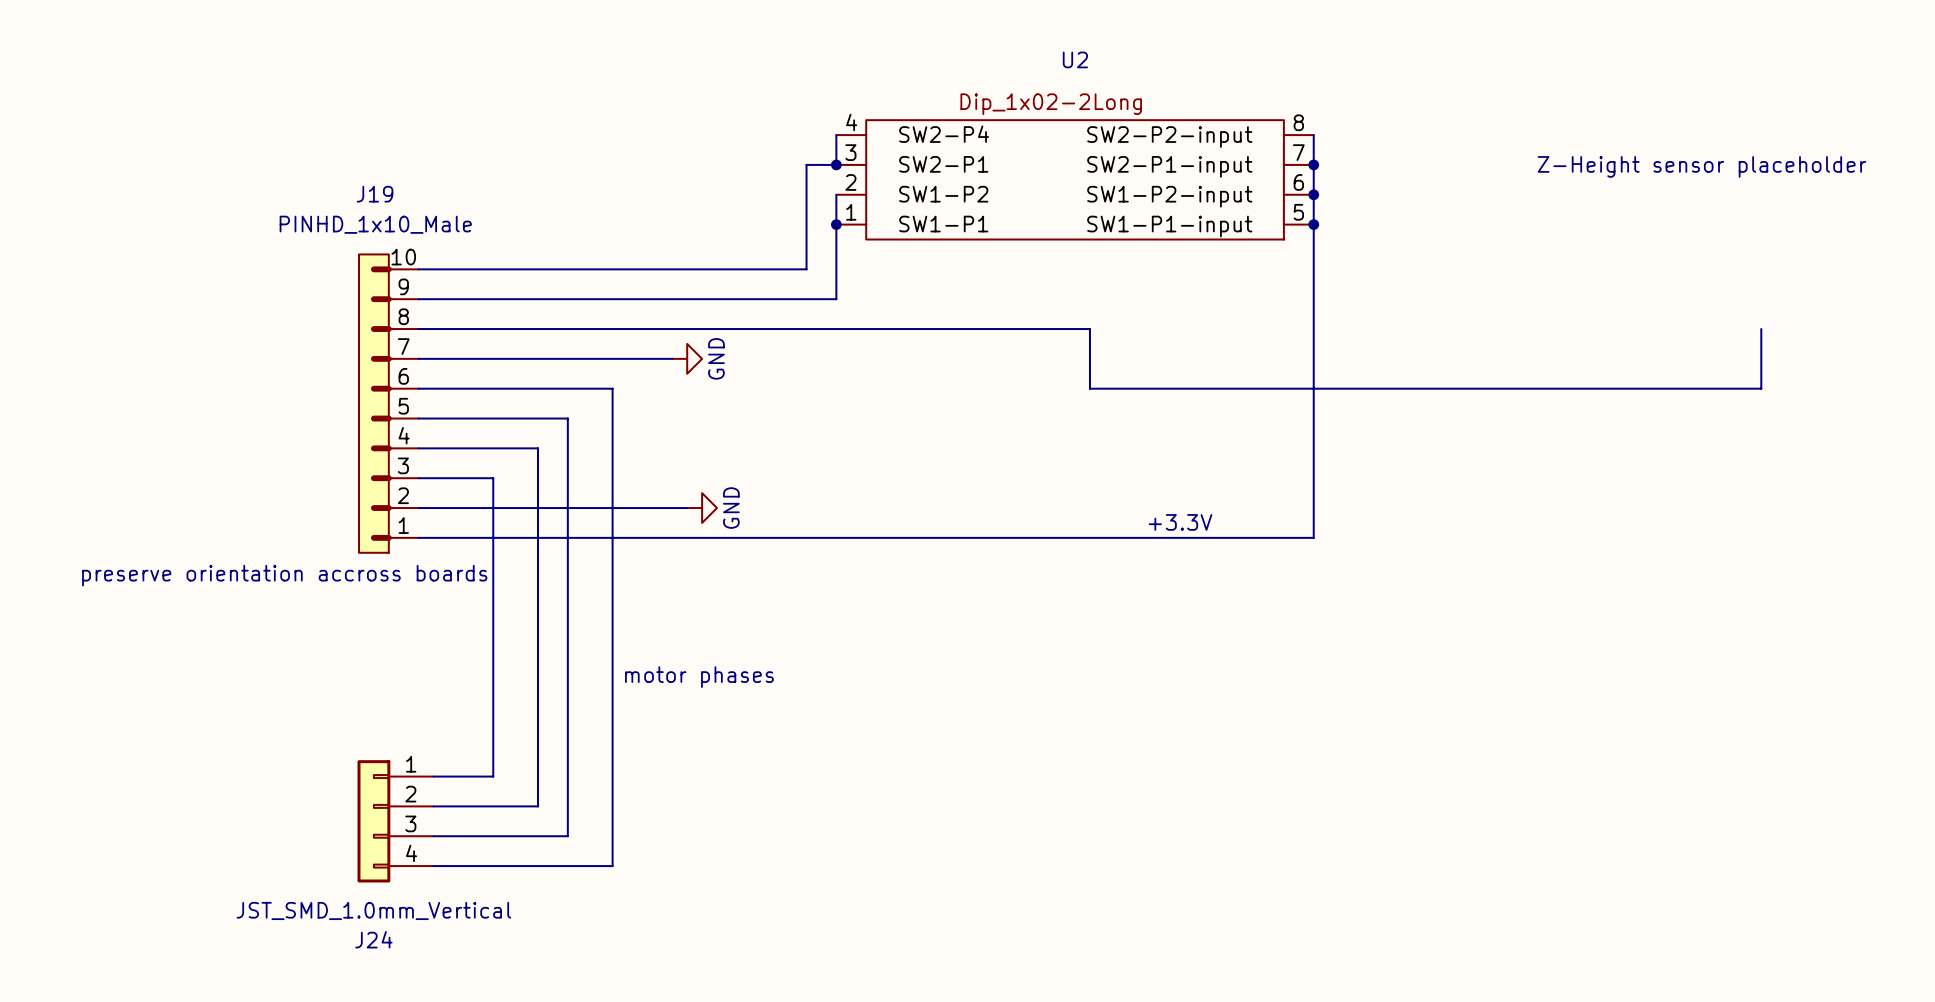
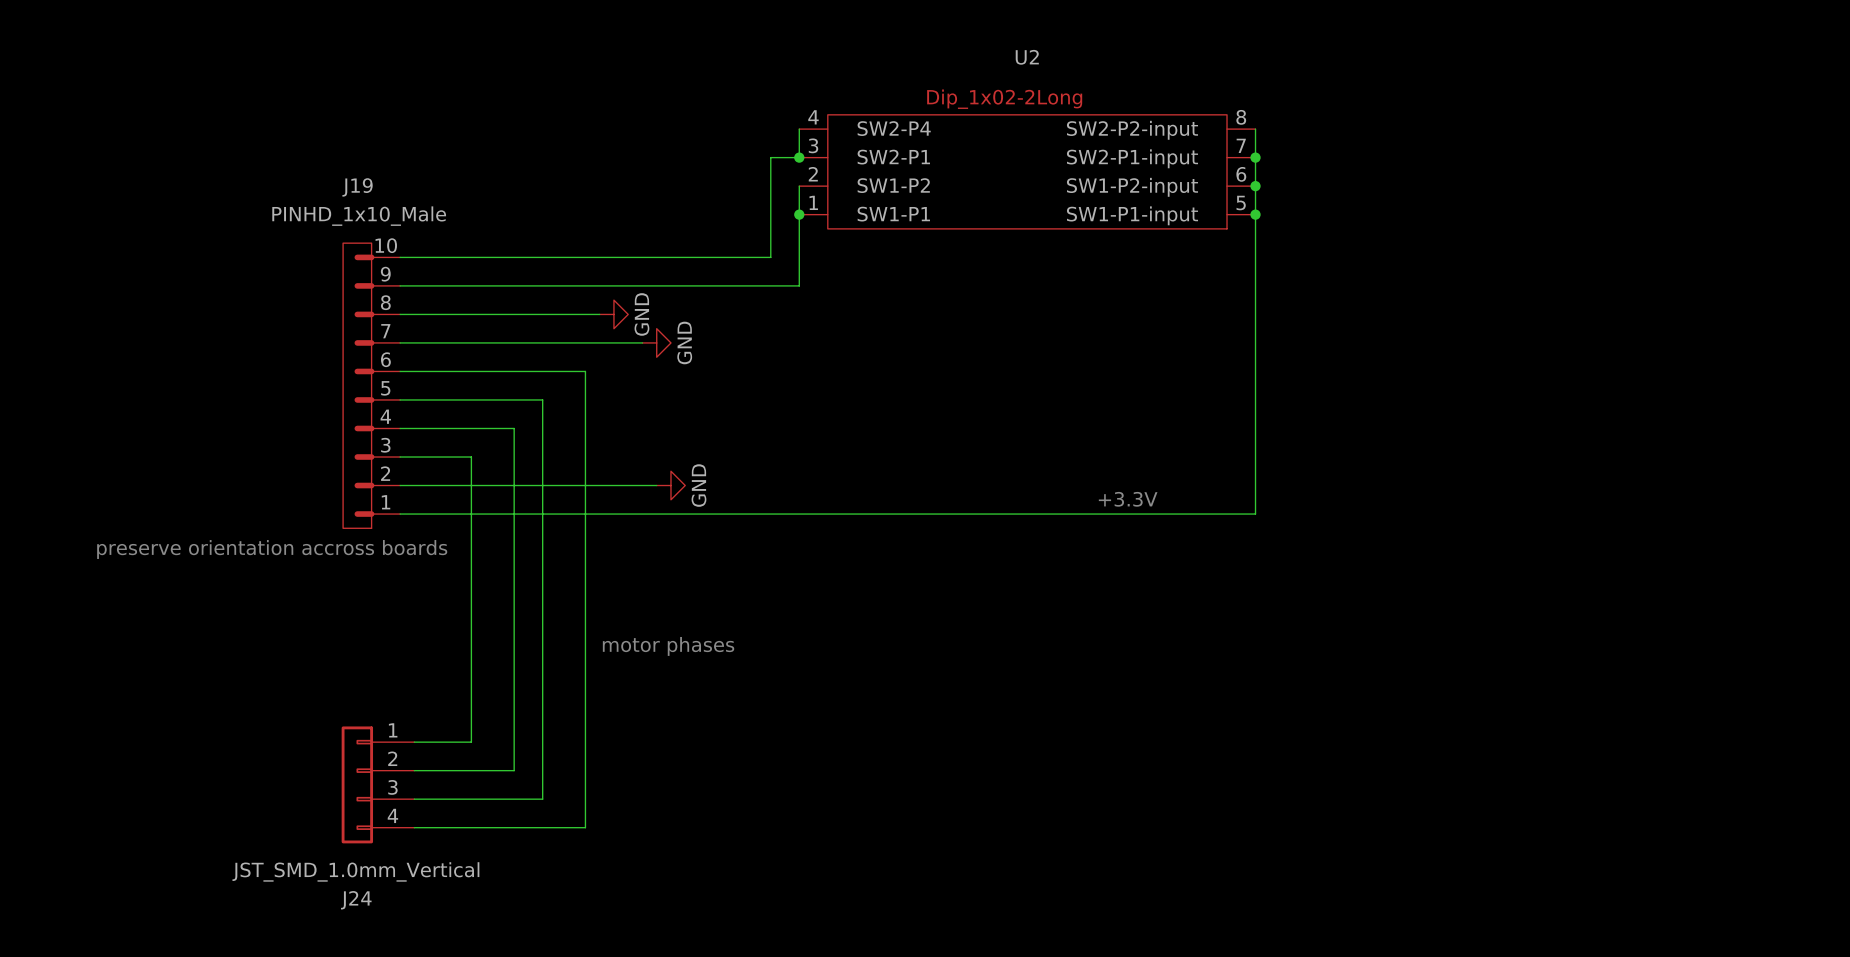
text: Z-Height sensor placeholder (1701, 166) -> none
wire: (627, 329) (1089, 329) (1089, 388) (1761, 388) (1761, 329) -> none
power symbol: none -> GND (613, 314)

